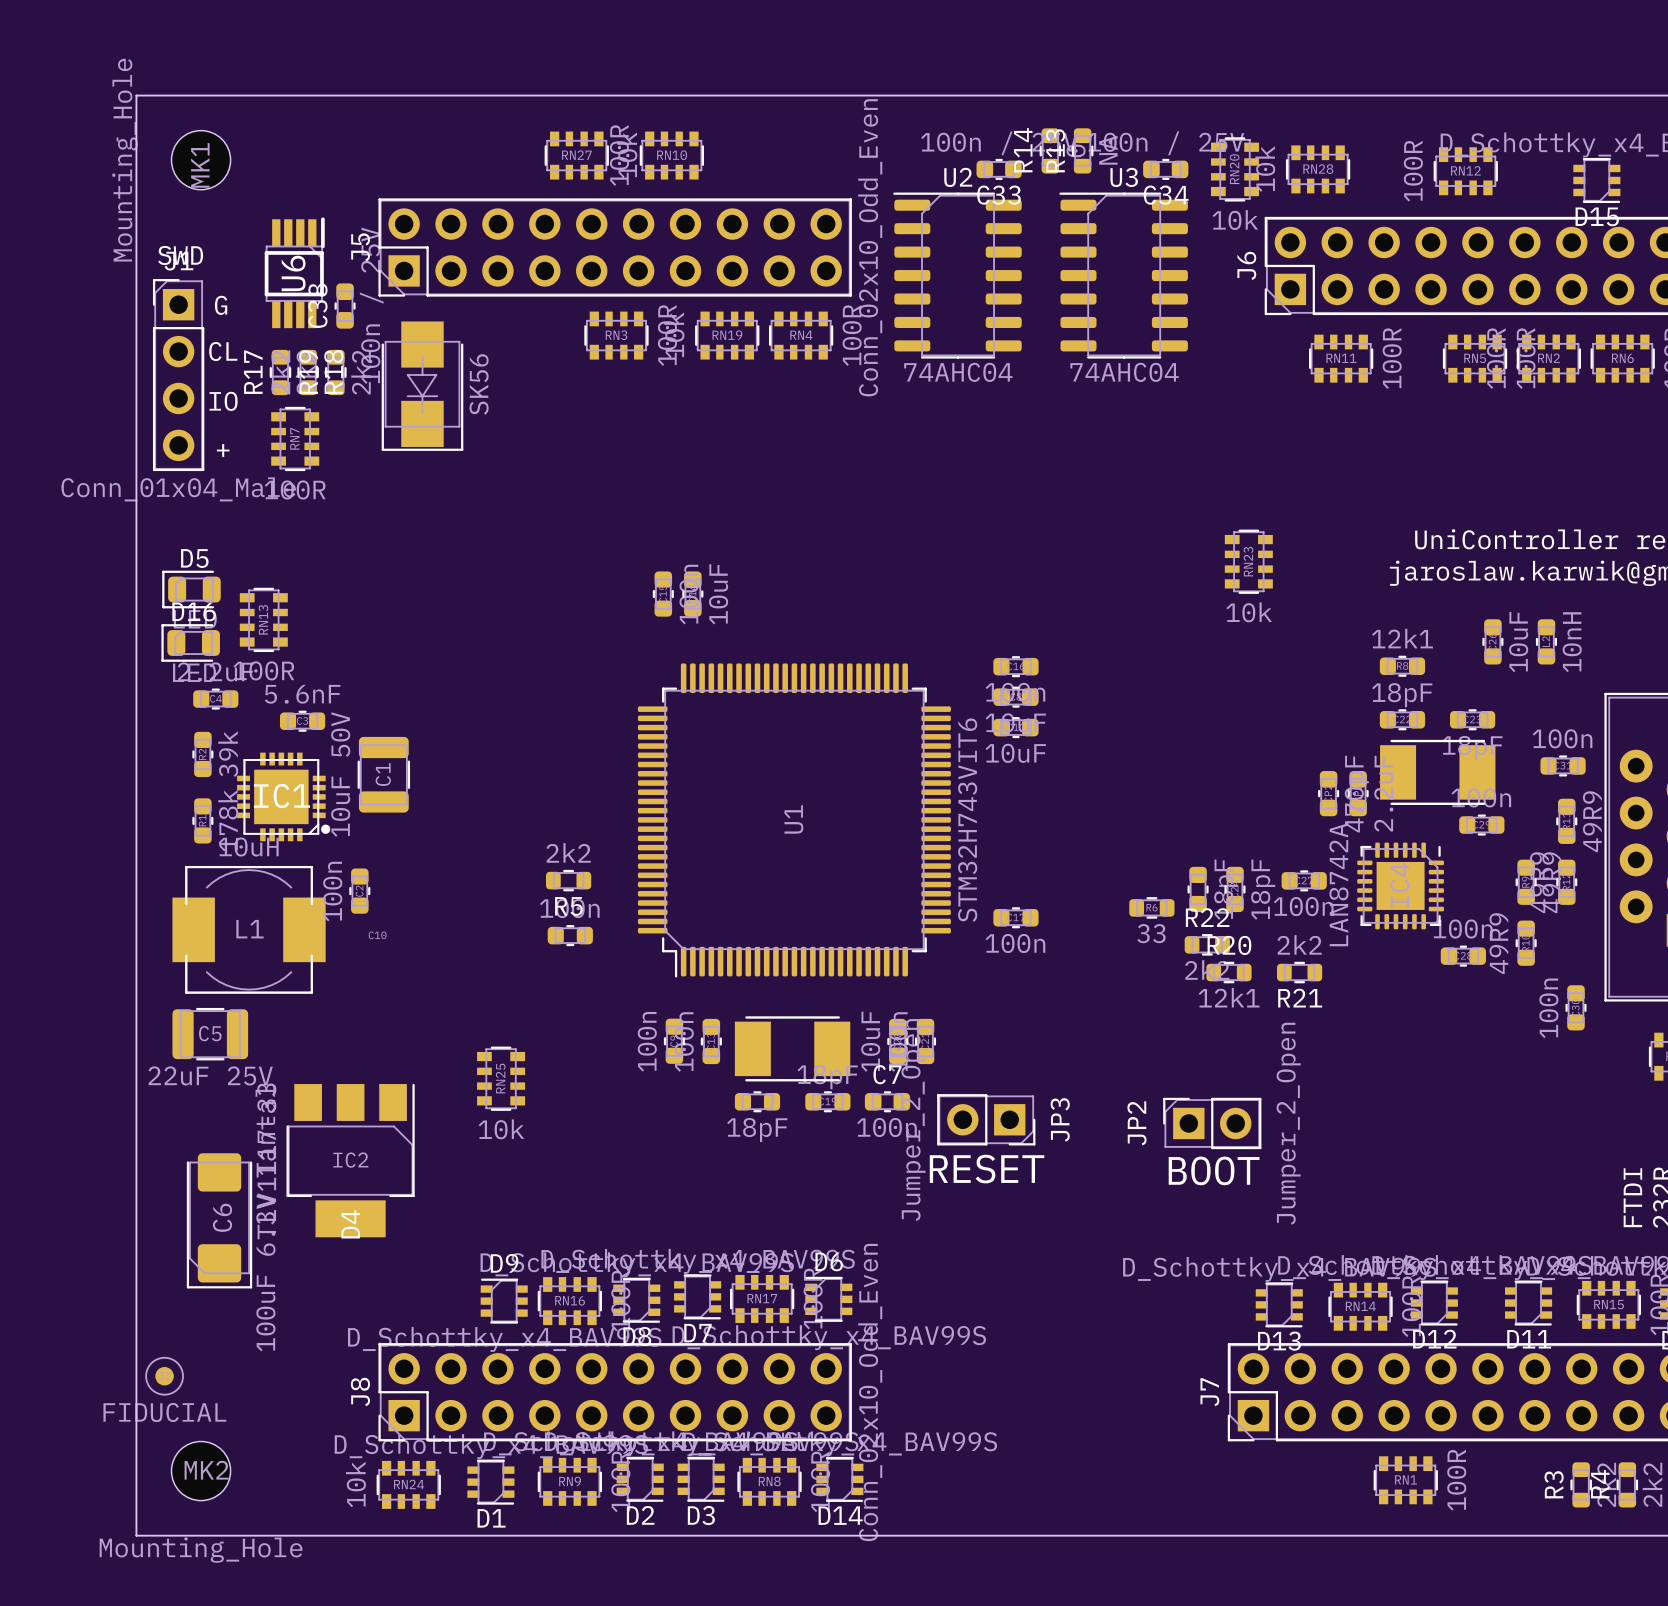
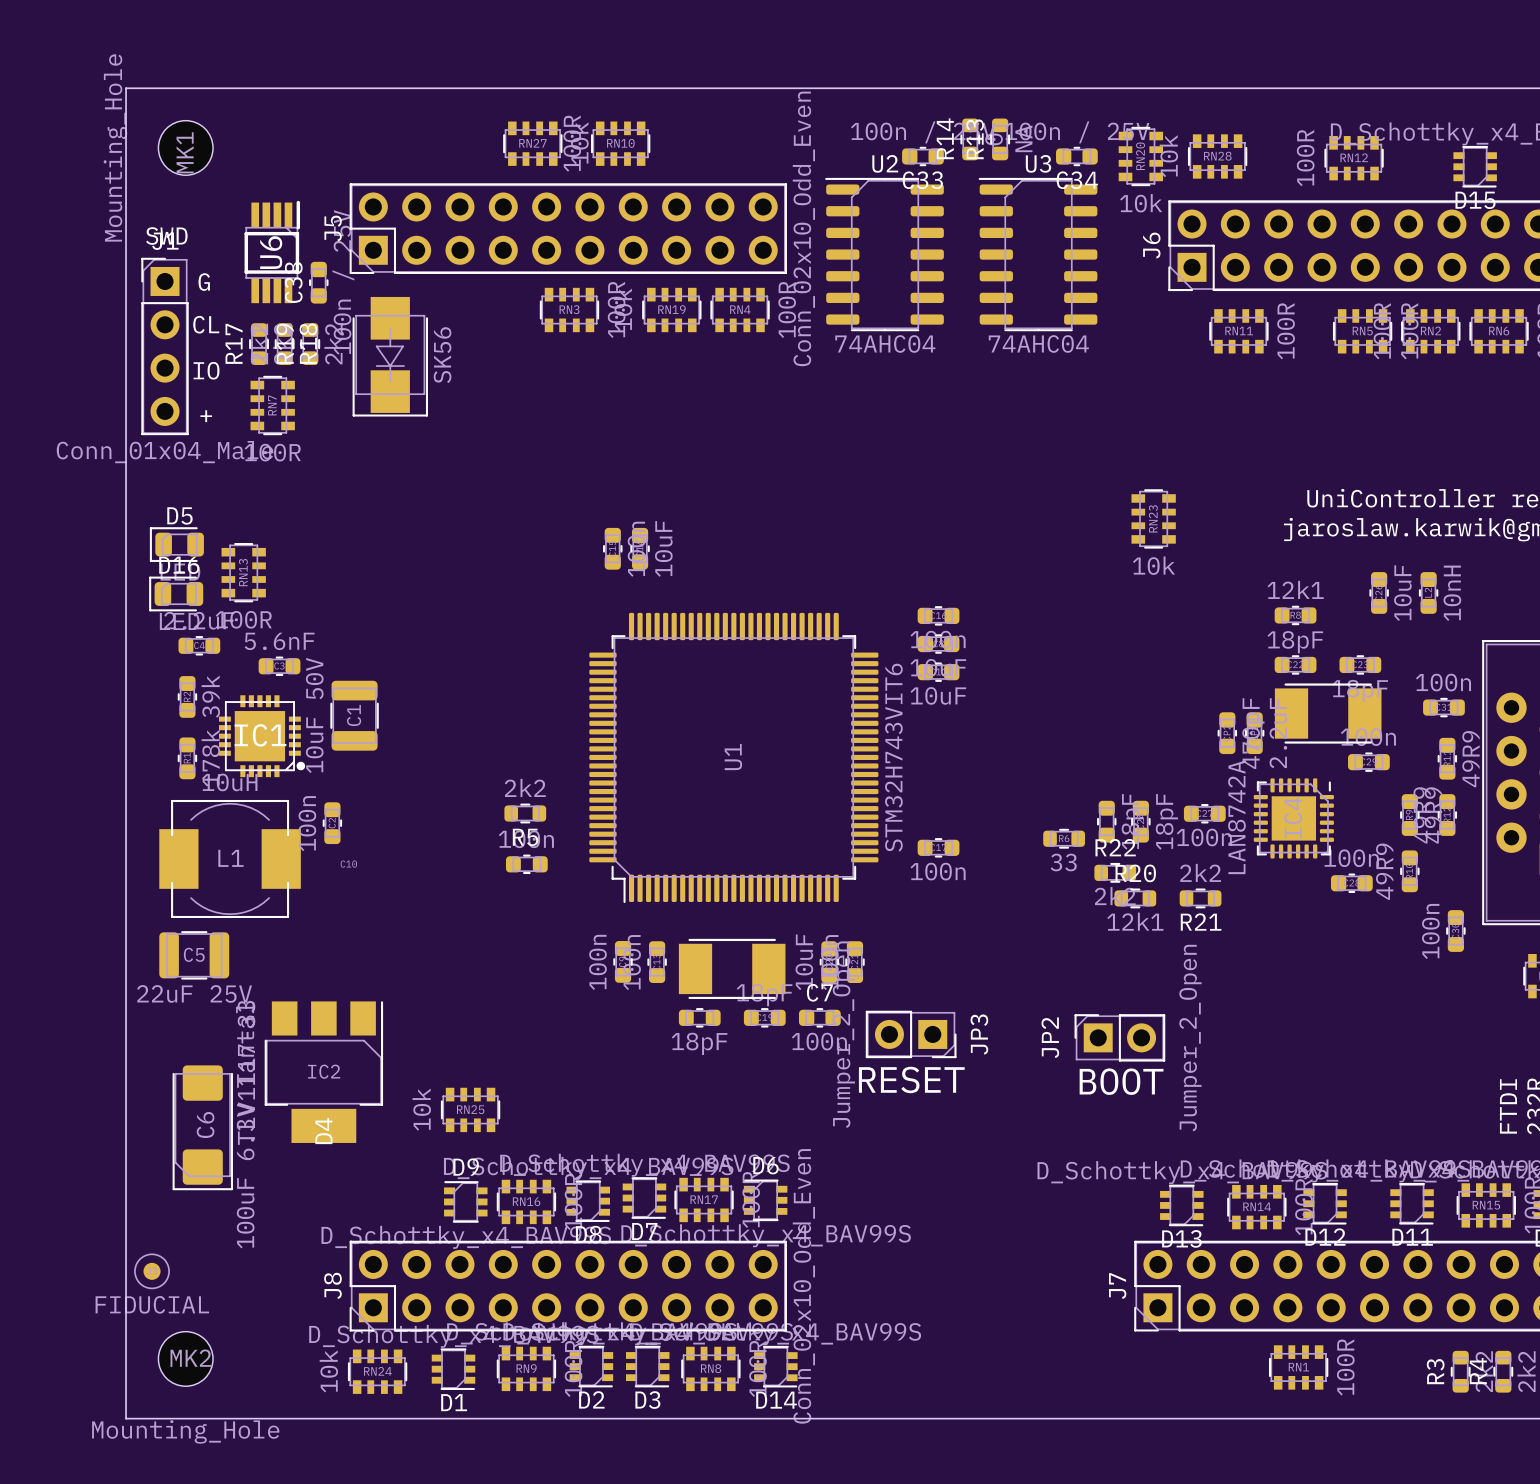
RN25 rotation: 0° (501, 1078) -> 90° clockwise (470, 1109)
RN25 position: (501, 1078) -> (470, 1109)

